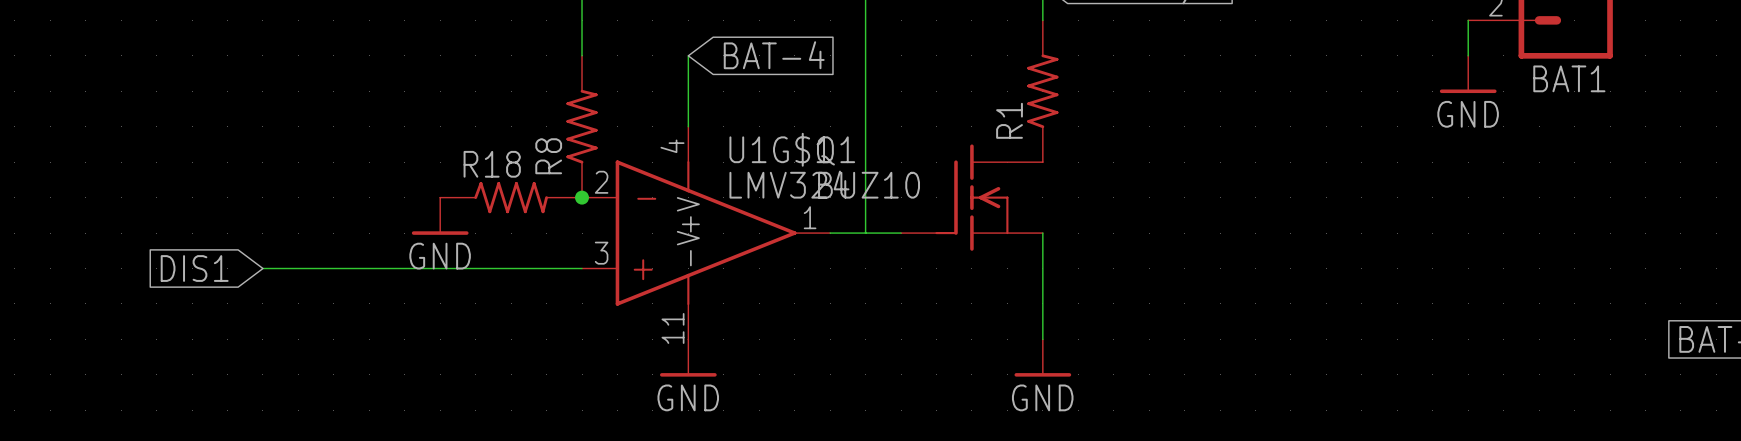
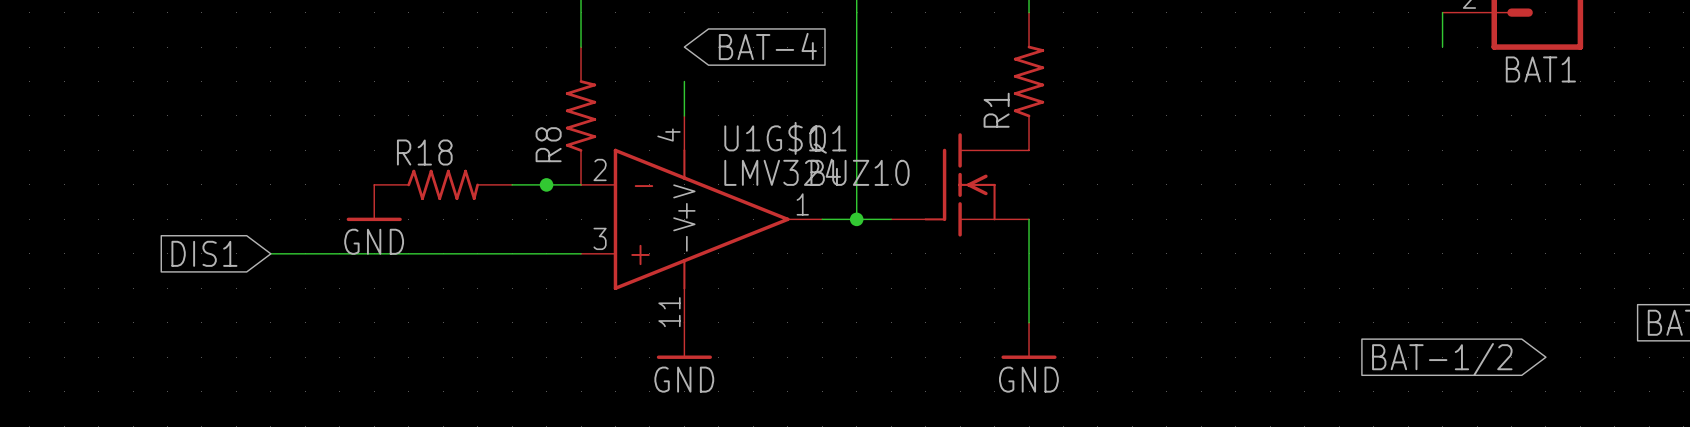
wire: (688, 55) (688, 91) -> none
power symbol: GND (1468, 74) -> none
R18 position: (511, 197) -> (443, 184)
junction position: (582, 197) -> (546, 184)
power symbol position: GND (440, 216) -> GND (374, 203)
junction: none -> (856, 219)
global label: none -> BAT-1/2 (1442, 359)

